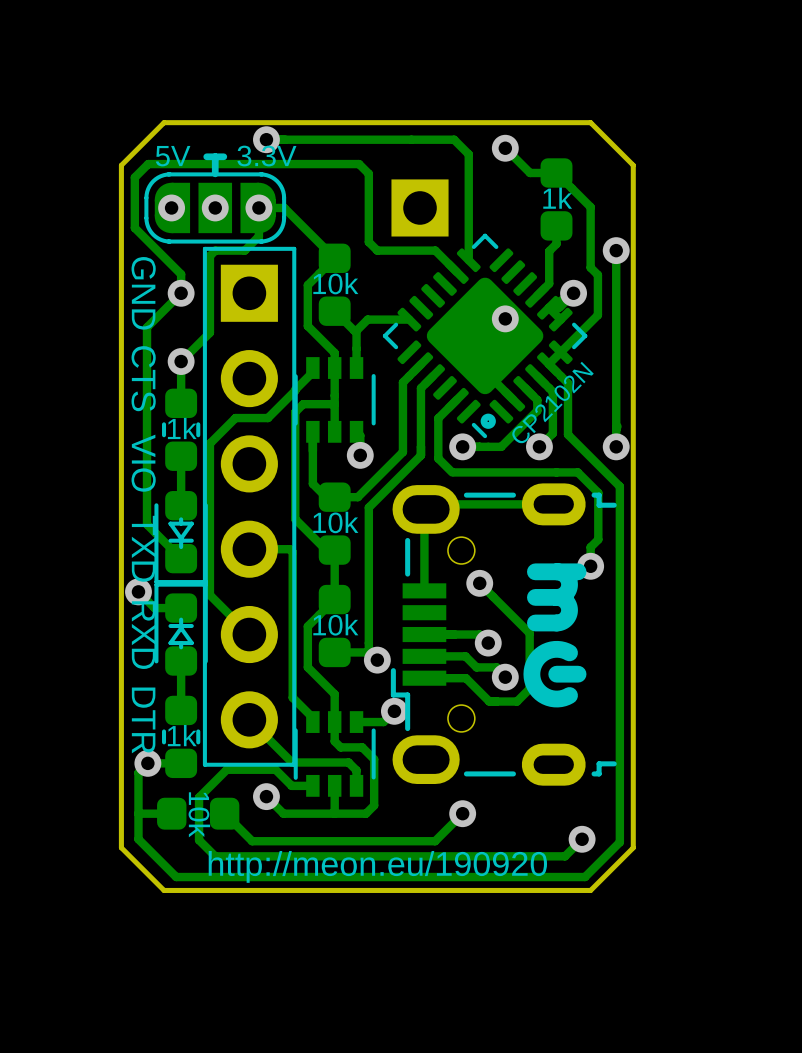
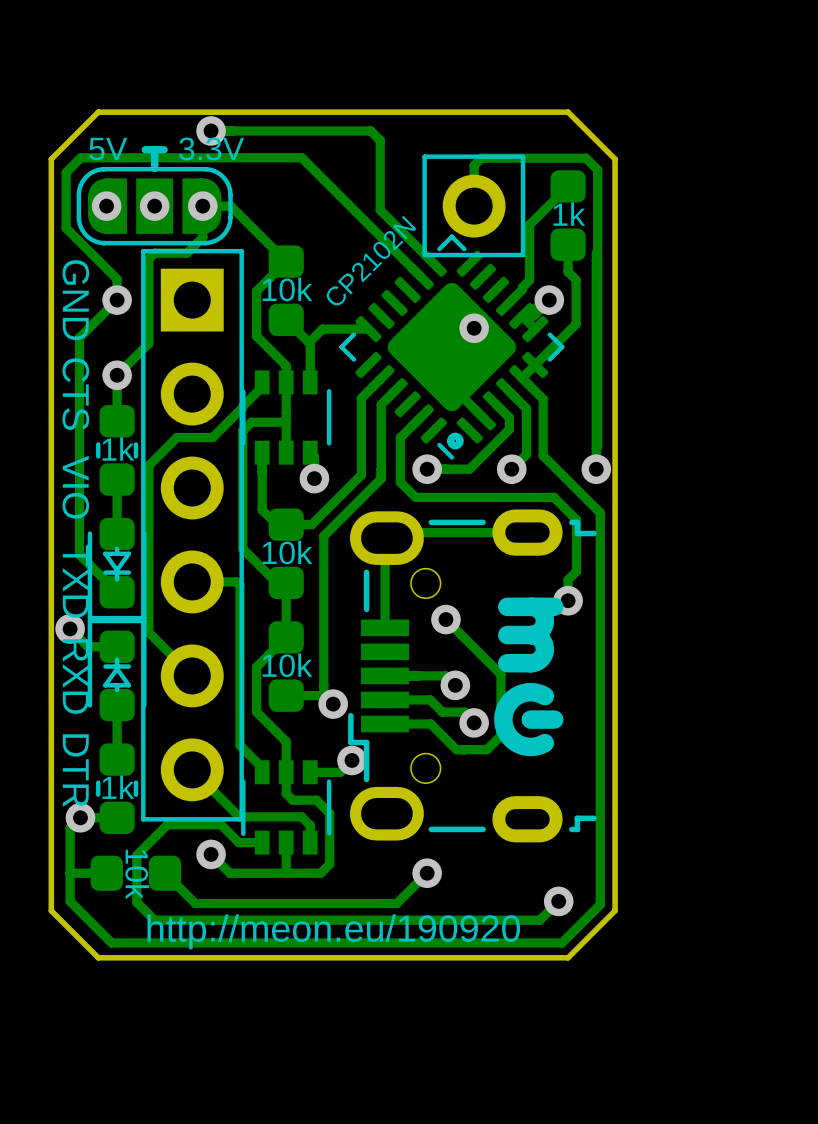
track: (411, 139) (454, 139) (468, 154) (468, 260) -> (370, 130) (380, 140) (380, 210) (433, 263)
track: (505, 148) (530, 172) (556, 172) (590, 207) (590, 242) -> none
via: (505, 148) -> none
track: (348, 164) (359, 164) (368, 173) (368, 242) (377, 250) (435, 250) -> (301, 157) (397, 253)
part position: (556, 199) -> (568, 215)
part: (420, 207) -> none
track: none -> (474, 206) (474, 165) (481, 158) (585, 158) (597, 169) (597, 446)
part: none -> (473, 205)
track: (556, 225) (556, 243) (549, 251) (549, 281) -> (568, 186) (529, 224) (529, 280) (522, 287)
via: (616, 250) -> none
part value position: CP2102N (552, 402) -> CP2102N (371, 260)

